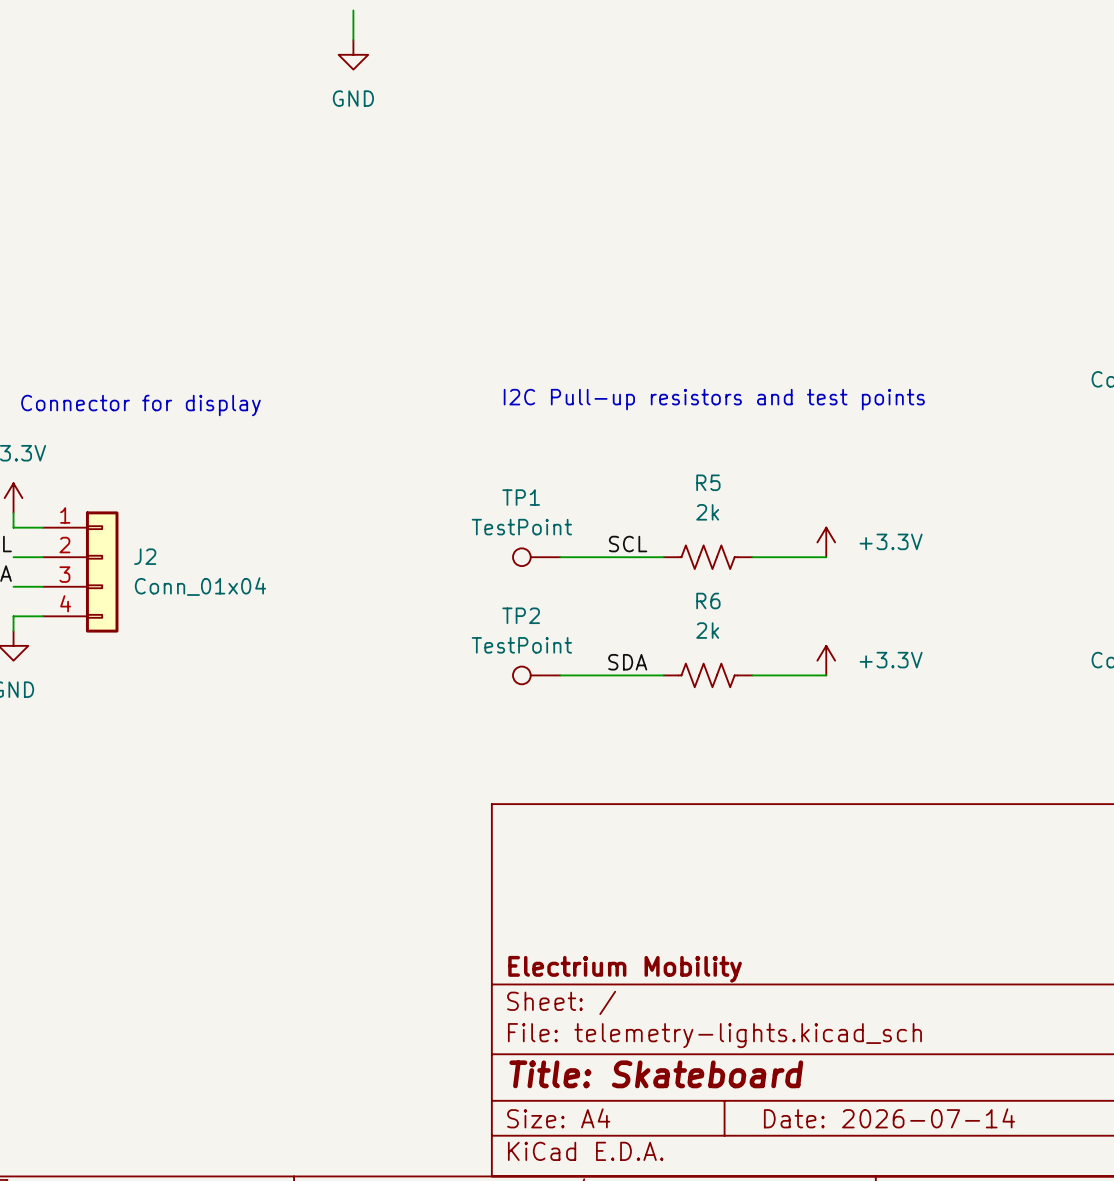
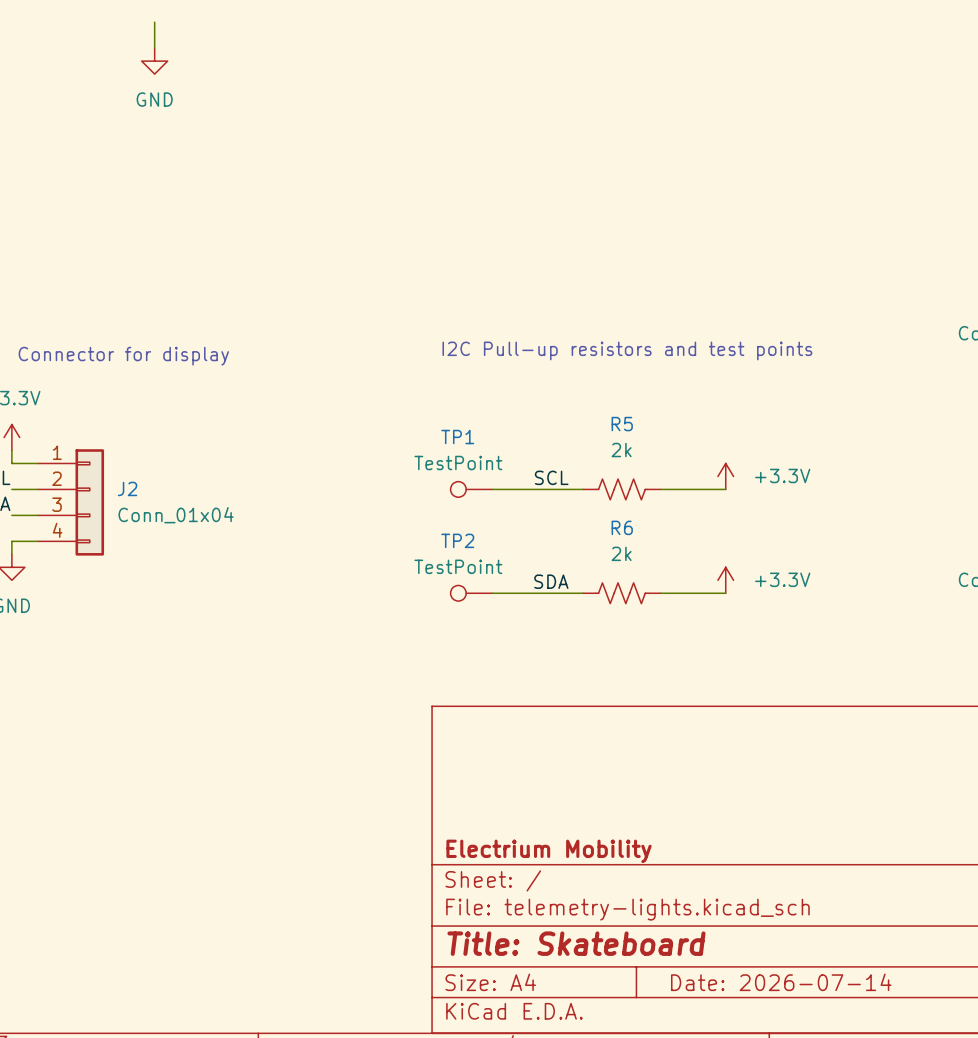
wire: (353, 10) (353, 40) -> (154, 22) (154, 48)
power symbol position: GND (353, 54) -> GND (154, 61)

